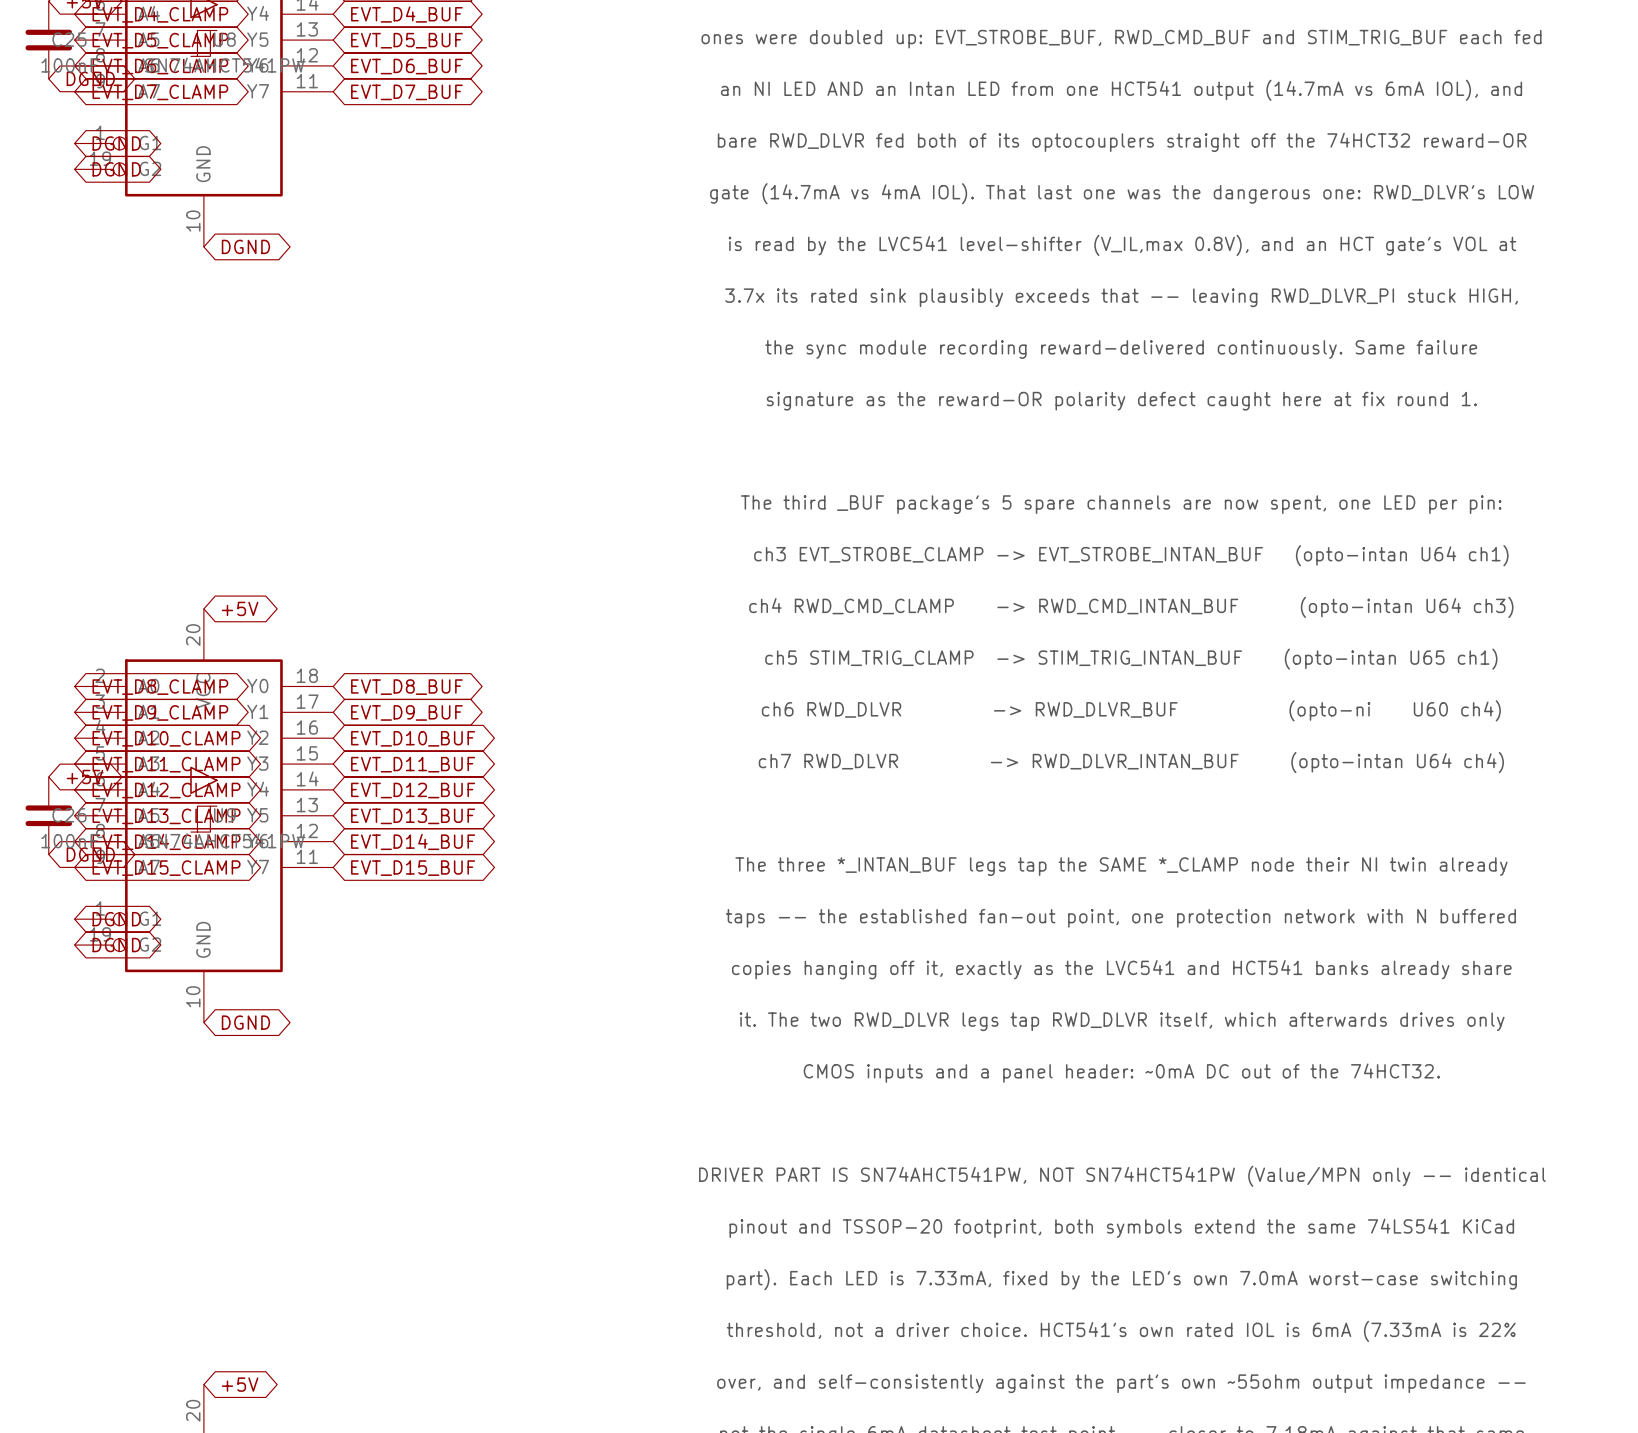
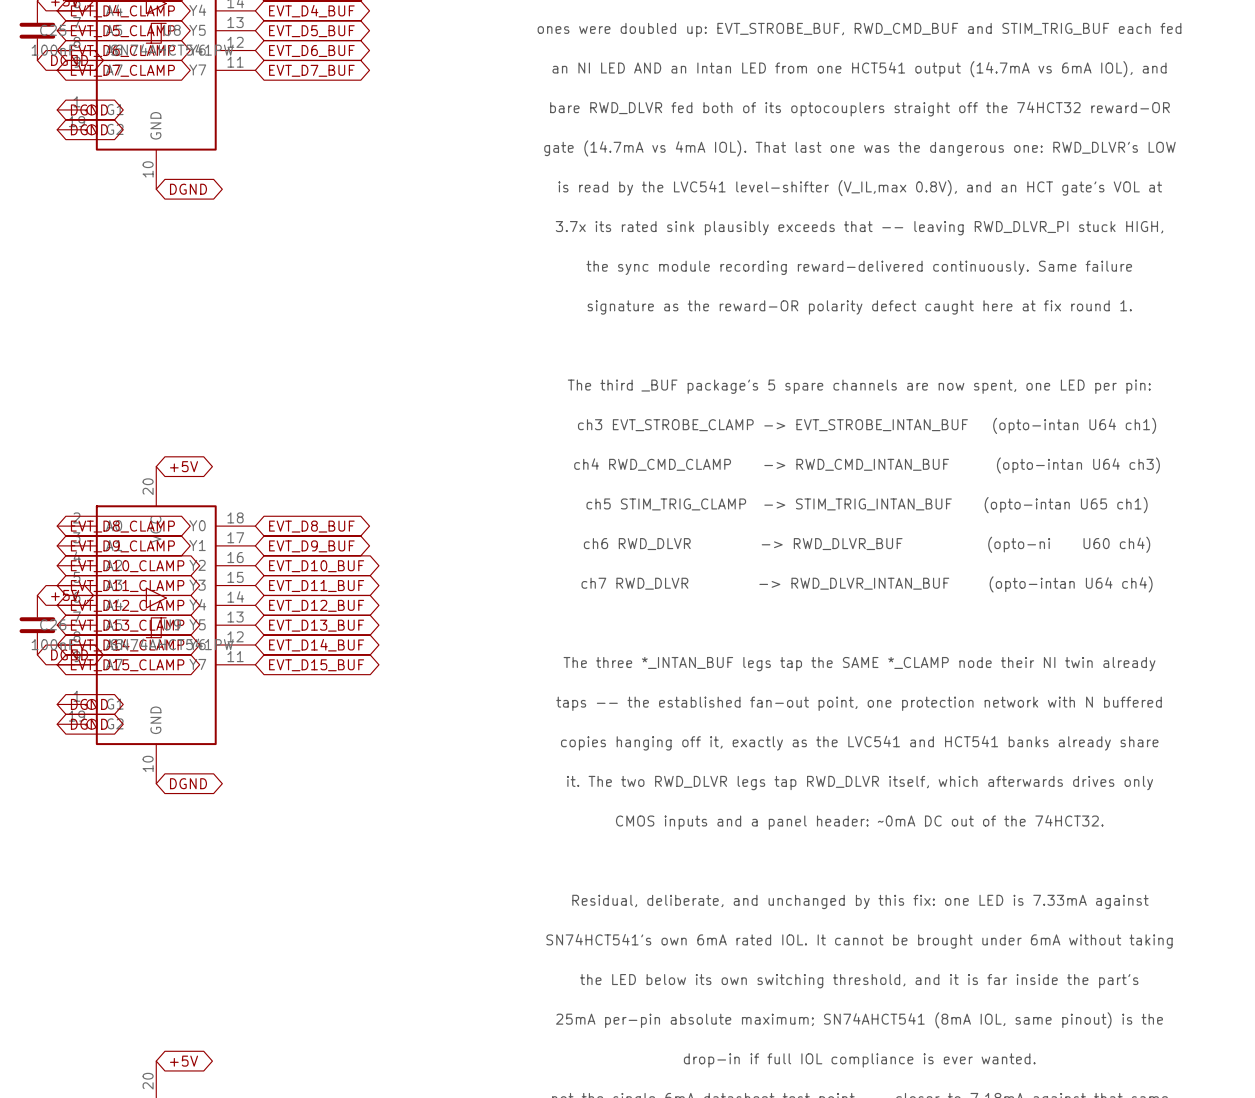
text: DRIVER PART IS SN74AHCT541PW, NOT SN74HCT541PW (Value/MPN only -- identical (1122, 1176) -> Residual, deliberate, and unchanged by this fix: one LED is 7.33mA against (860, 901)
text: pinout and TSSOP-20 footprint, both symbols extend the same 74LS541 KiCad (1121, 1228) -> SN74HCT541's own 6mA rated IOL. It cannot be brought under 6mA without taking (859, 941)
text: part). Each LED is 7.33mA, fixed by the LED's own 7.0mA worst-case switching (1121, 1279) -> the LED below its own switching threshold, and it is far inside the part's (859, 981)
text: threshold, not a driver choice. HCT541's own rated IOL is 6mA (7.33mA is 22% (1121, 1331) -> 25mA per-pin absolute maximum; SN74AHCT541 (8mA IOL, same pinout) is the (859, 1020)
text: over, and self-consistently against the part's own ~55ohm output impedance -- (1121, 1383) -> drop-in if full IOL compliance is ever wanted. (859, 1060)

